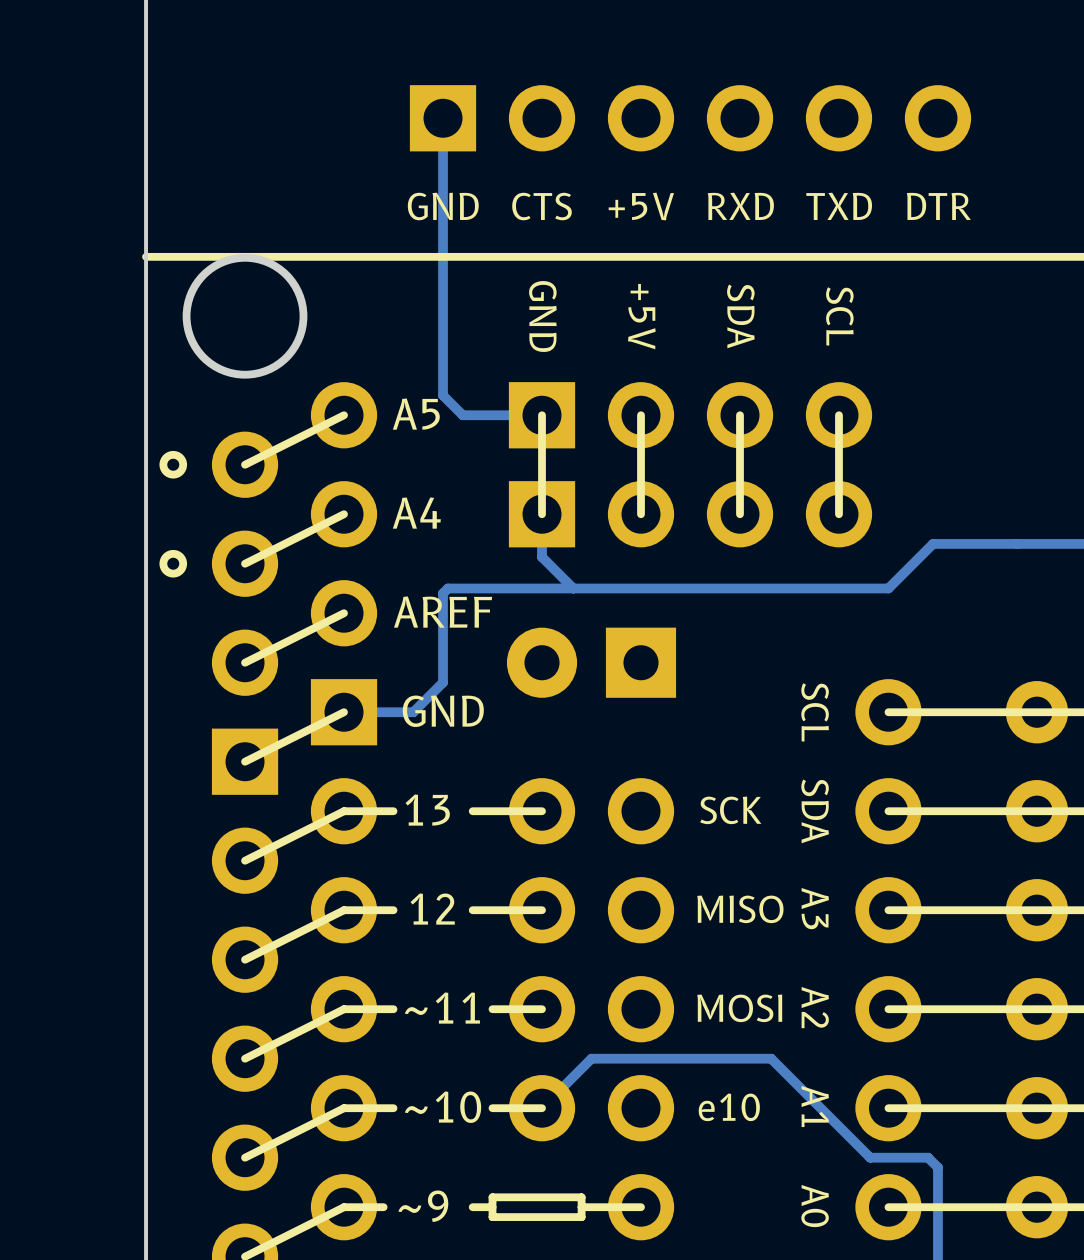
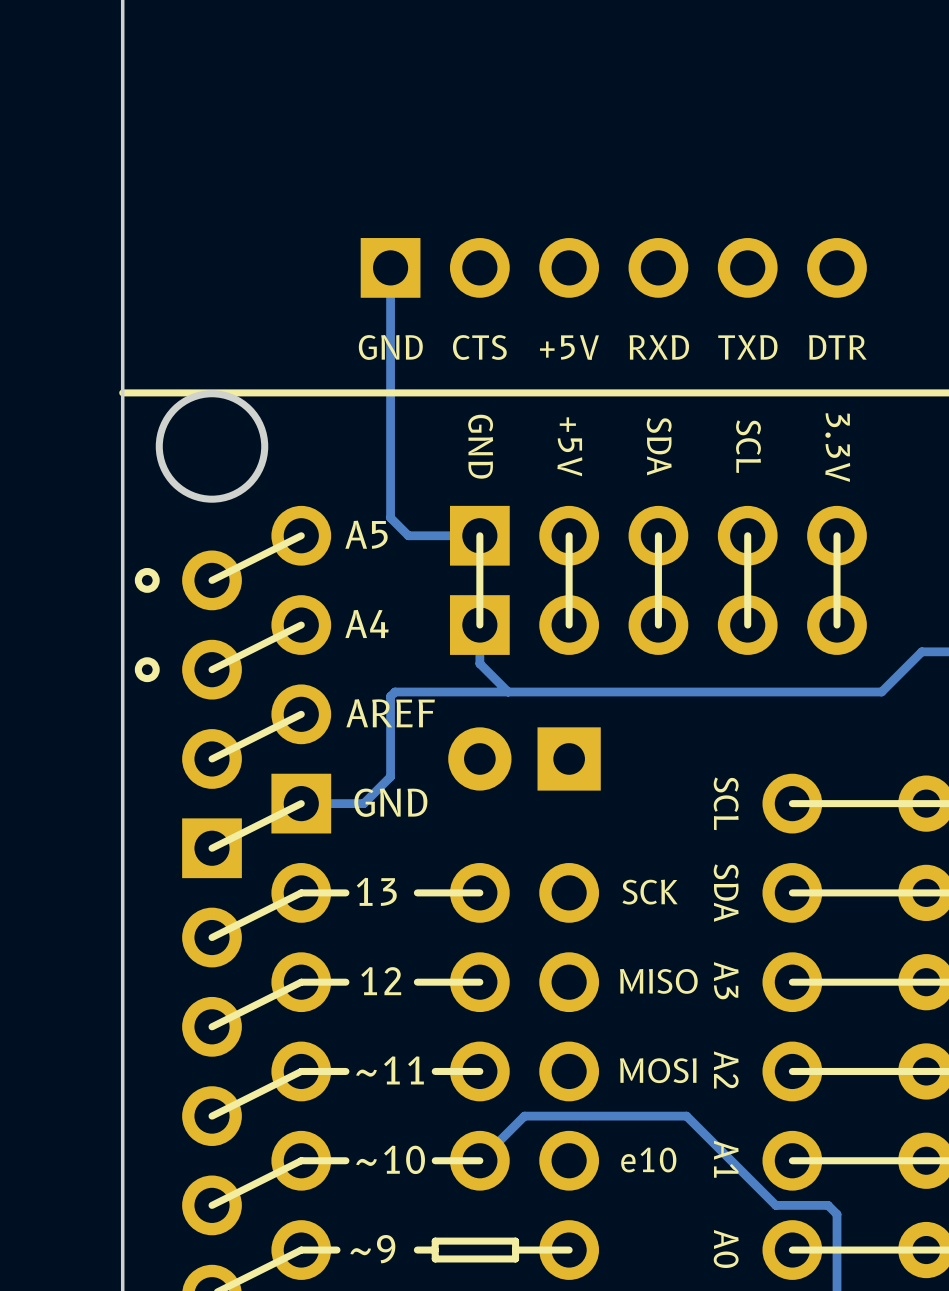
text: none -> 3.3V (837, 447)
part: none -> (658, 535)
line: none -> (837, 535) (837, 625)
part: none -> (658, 625)
track: (1032, 543) (933, 543) (888, 588) -> (921, 651) (881, 692) (792, 692)

